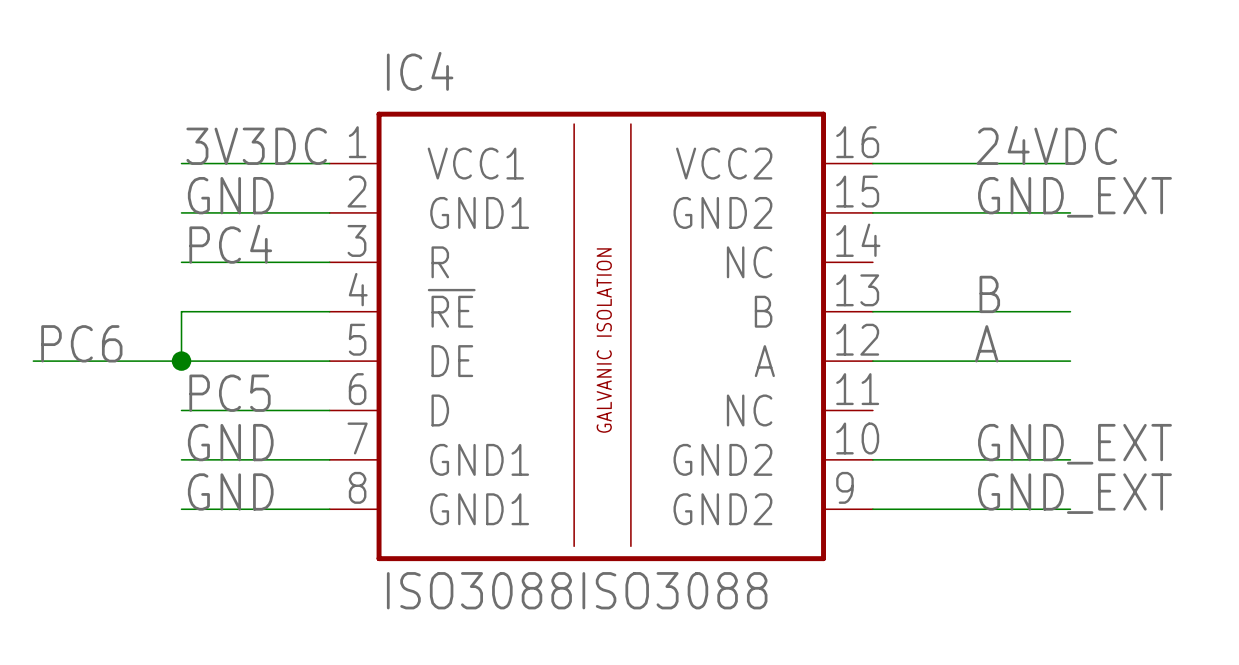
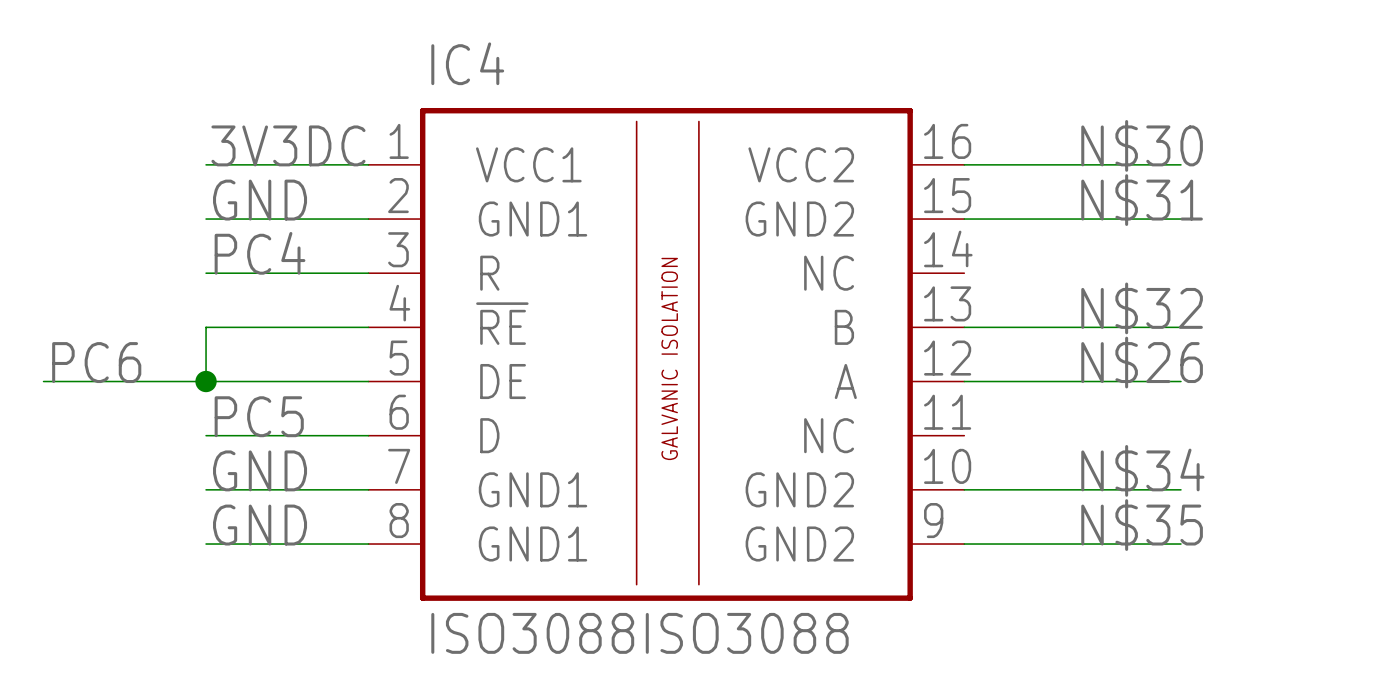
label: 24VDC (1046, 145) -> N$30 (1142, 145)
label: GND_EXT (1074, 197) -> N$31 (1142, 200)
label: B (989, 294) -> N$32 (1142, 308)
label: A (986, 343) -> N$26 (1142, 362)
label: GND_EXT (1074, 444) -> N$34 (1142, 470)
label: GND_EXT (1074, 493) -> N$35 (1142, 525)

